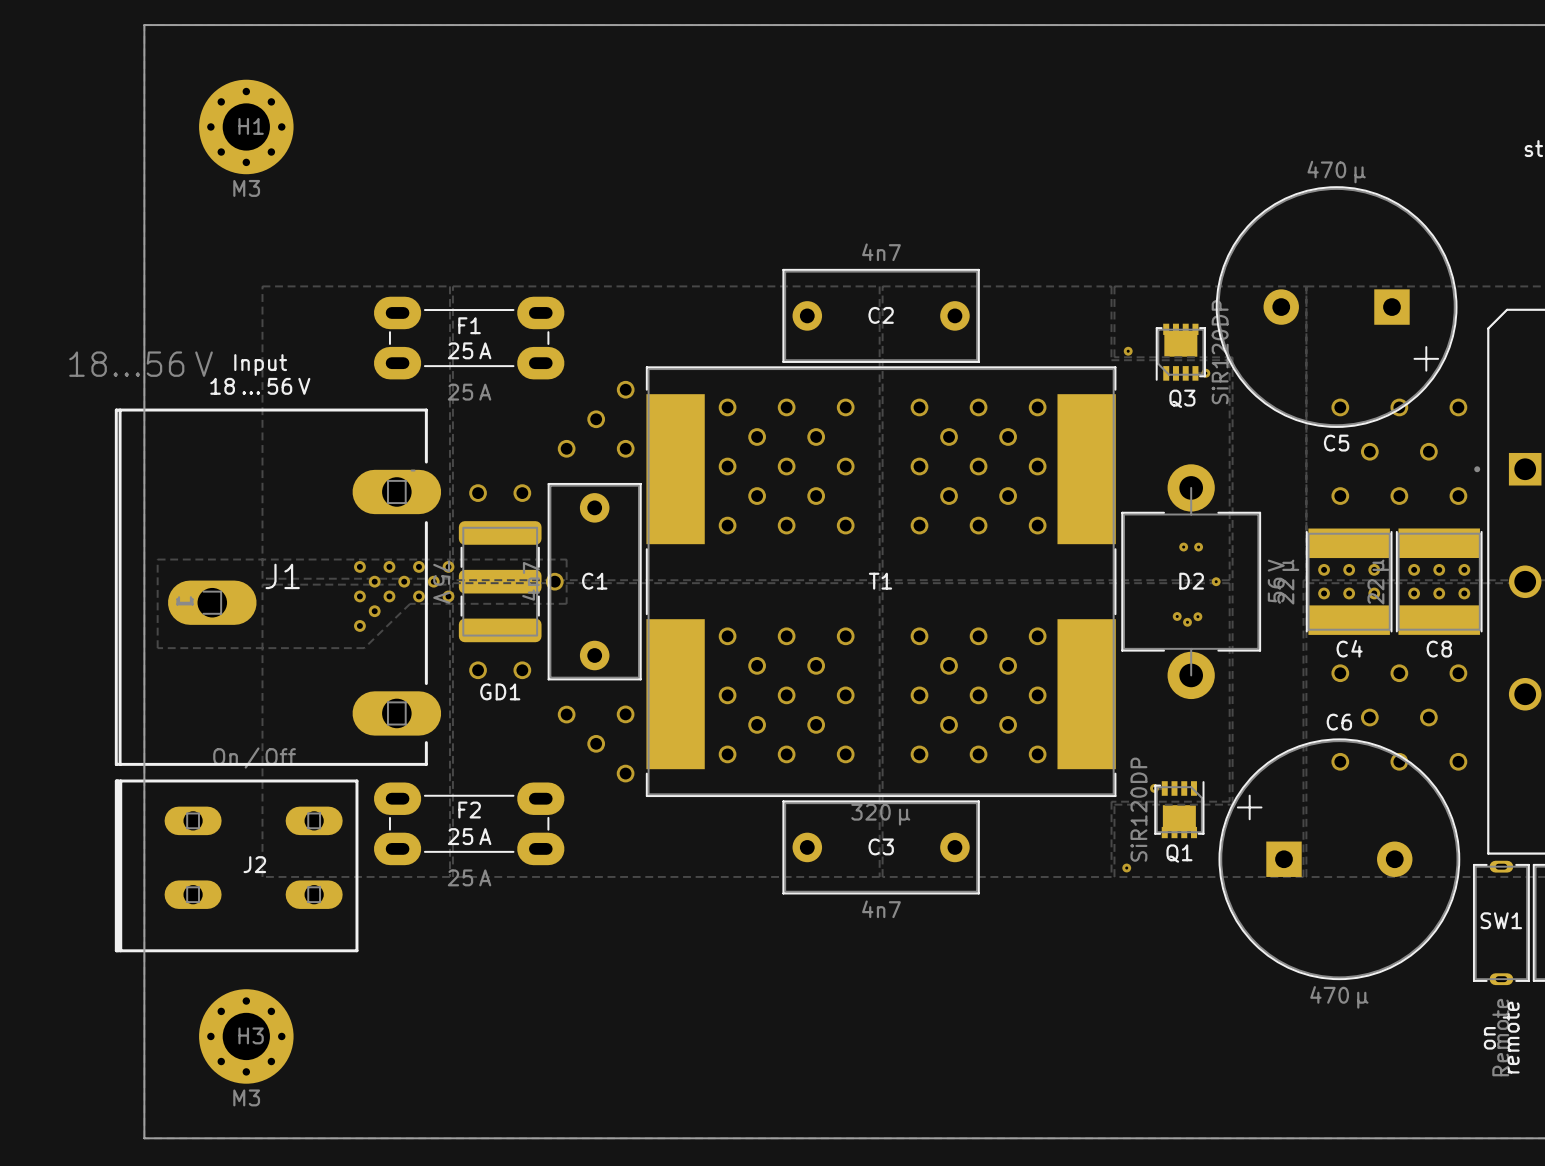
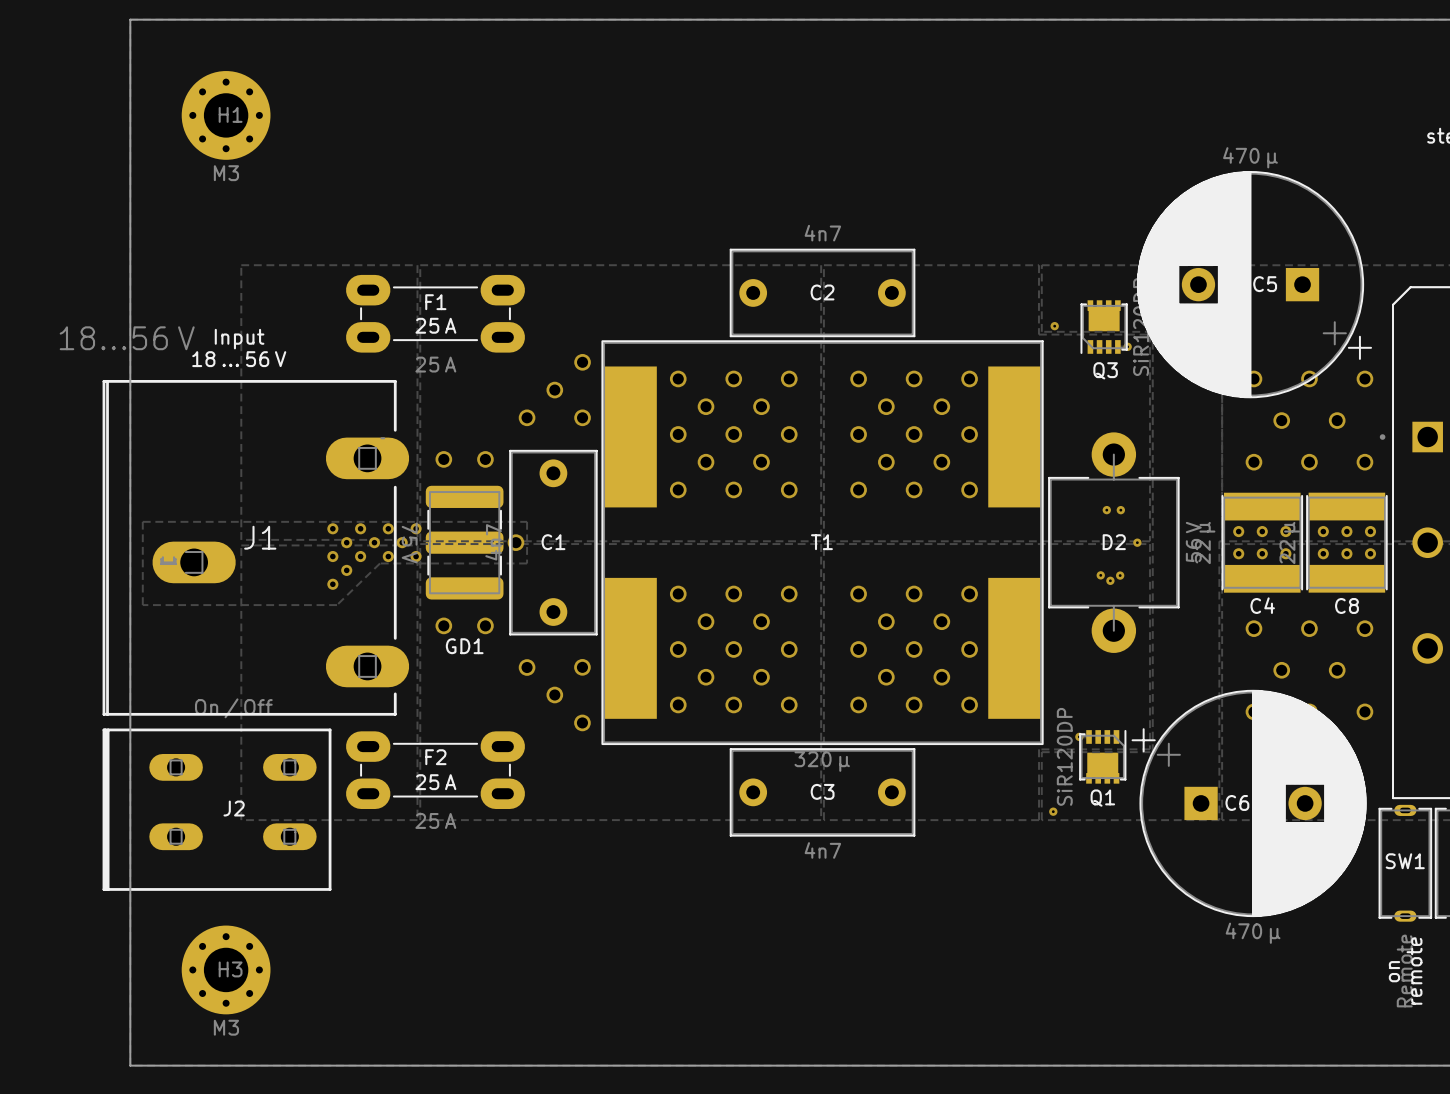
C5 footprint: [1215, 186, 1458, 428] -> [1137, 171, 1372, 399]
T1 footprint: [646, 366, 1117, 797] -> [601, 340, 1044, 745]
C5 name position: C5 (1336, 443) -> C5 (1265, 284)
C6 name position: C6 (1339, 722) -> C6 (1237, 802)
C6 footprint: [1218, 738, 1461, 981] -> [1131, 689, 1367, 917]

